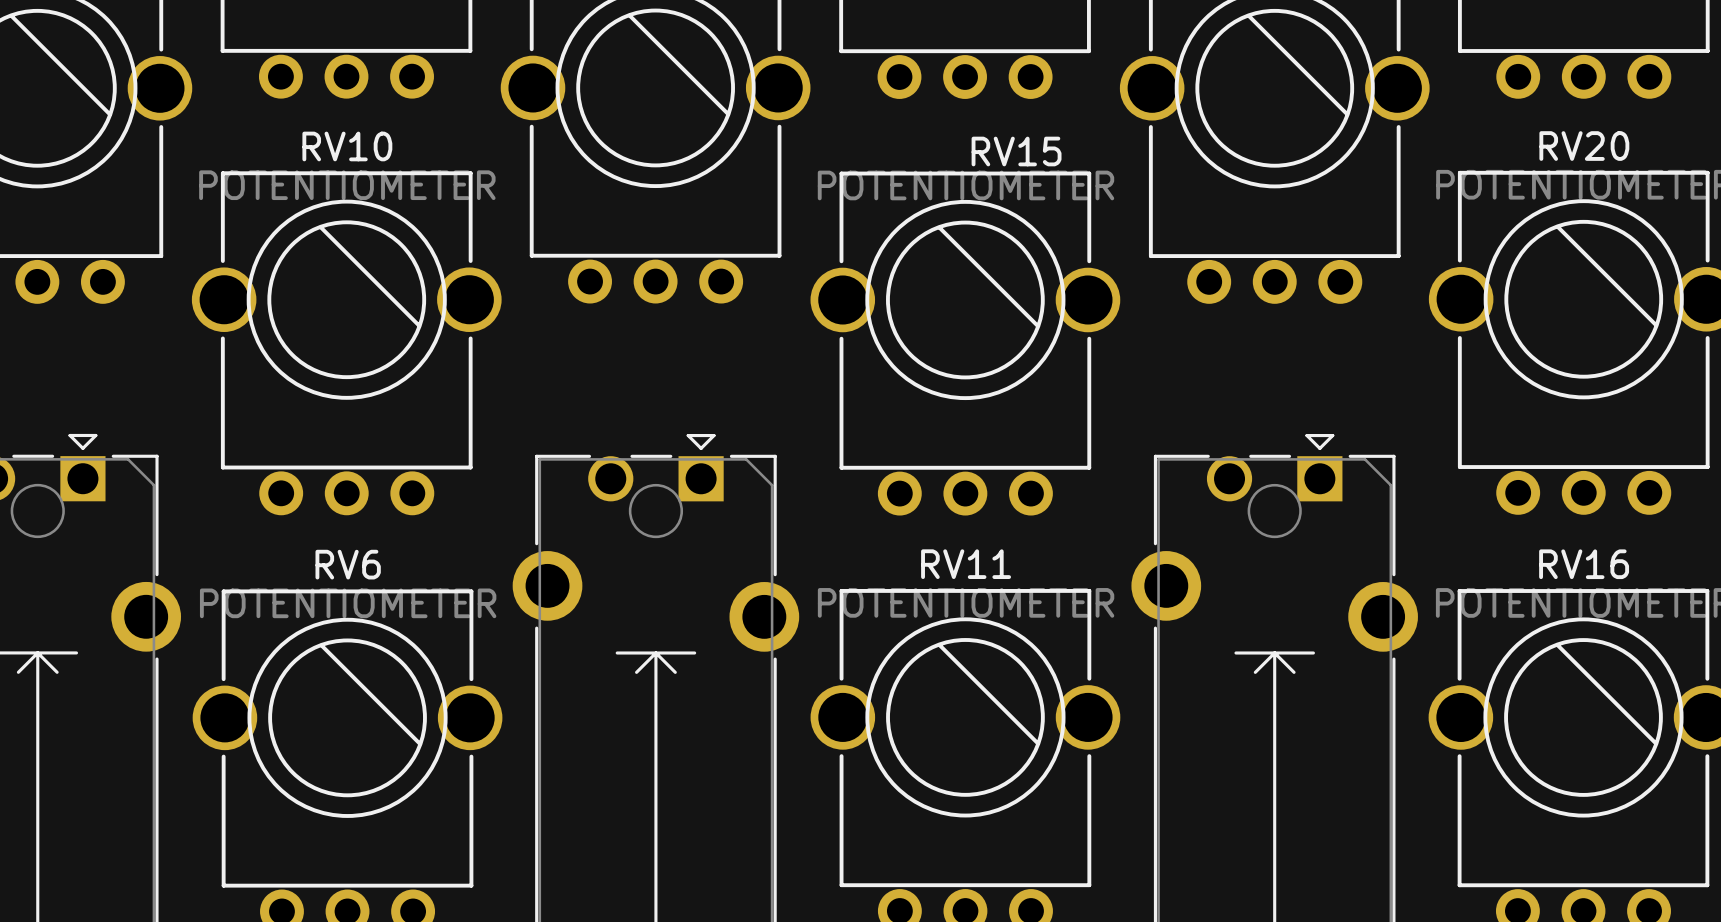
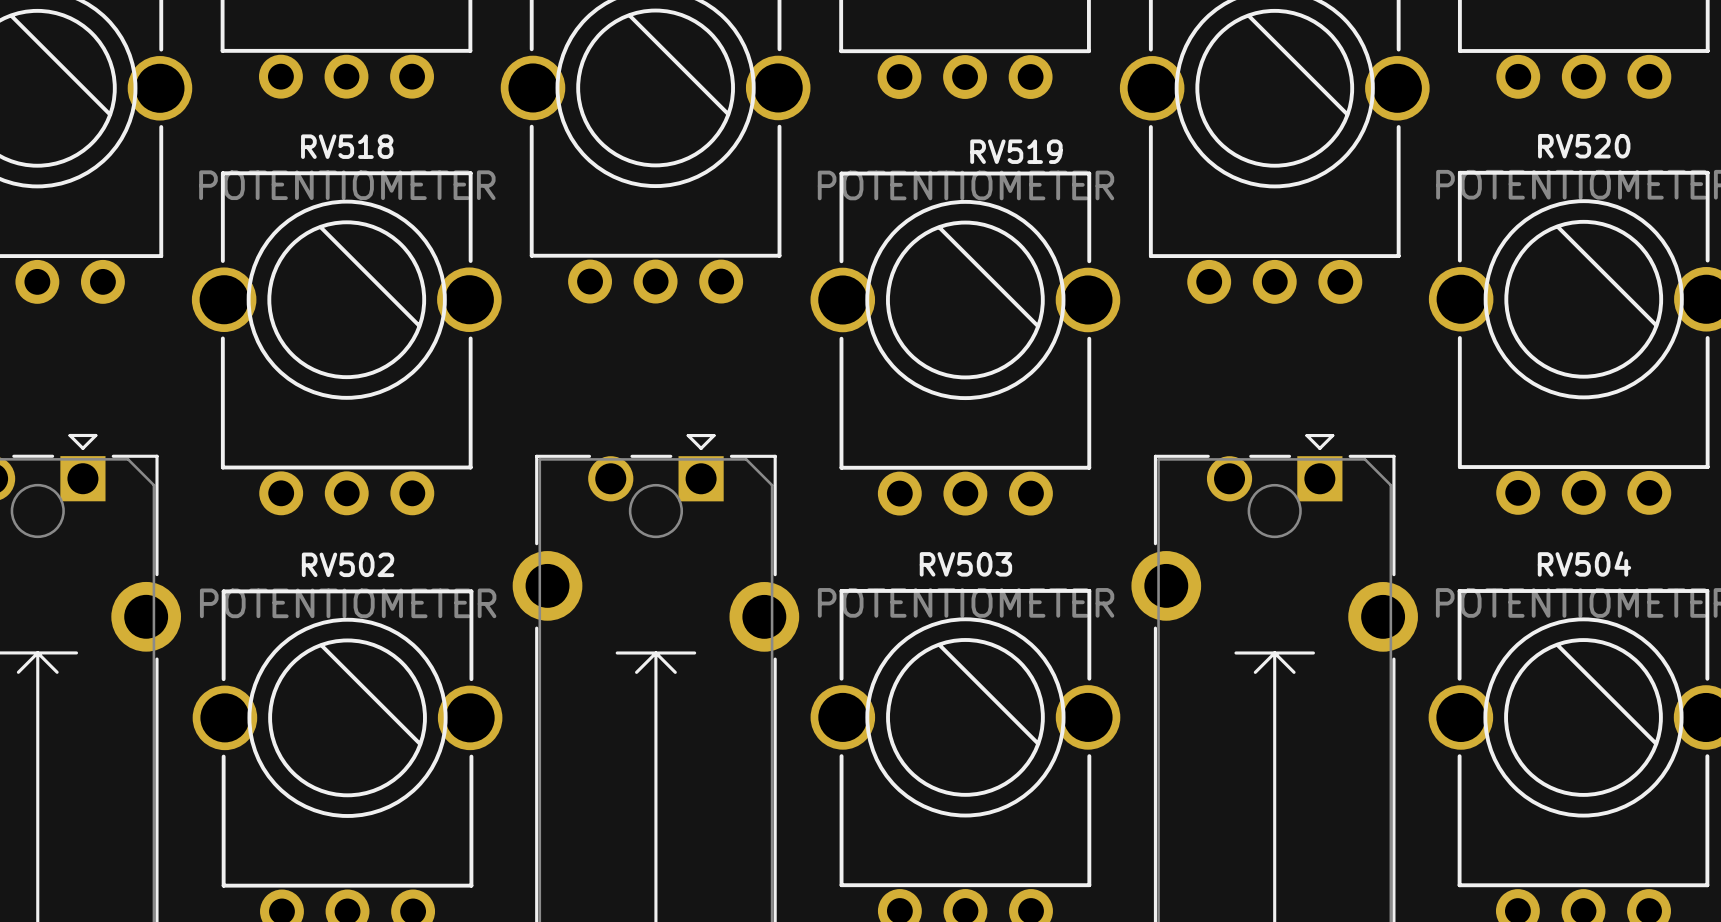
RV10 name: RV10 (347, 146) -> RV518 (347, 146)
RV20 name: RV20 (1584, 146) -> RV520 (1584, 146)
RV15 name: RV15 (1016, 151) -> RV519 (1016, 151)
RV6 name: RV6 (348, 564) -> RV502 (348, 564)
RV11 name: RV11 (966, 564) -> RV503 (965, 564)
RV16 name: RV16 (1584, 564) -> RV504 (1584, 563)

